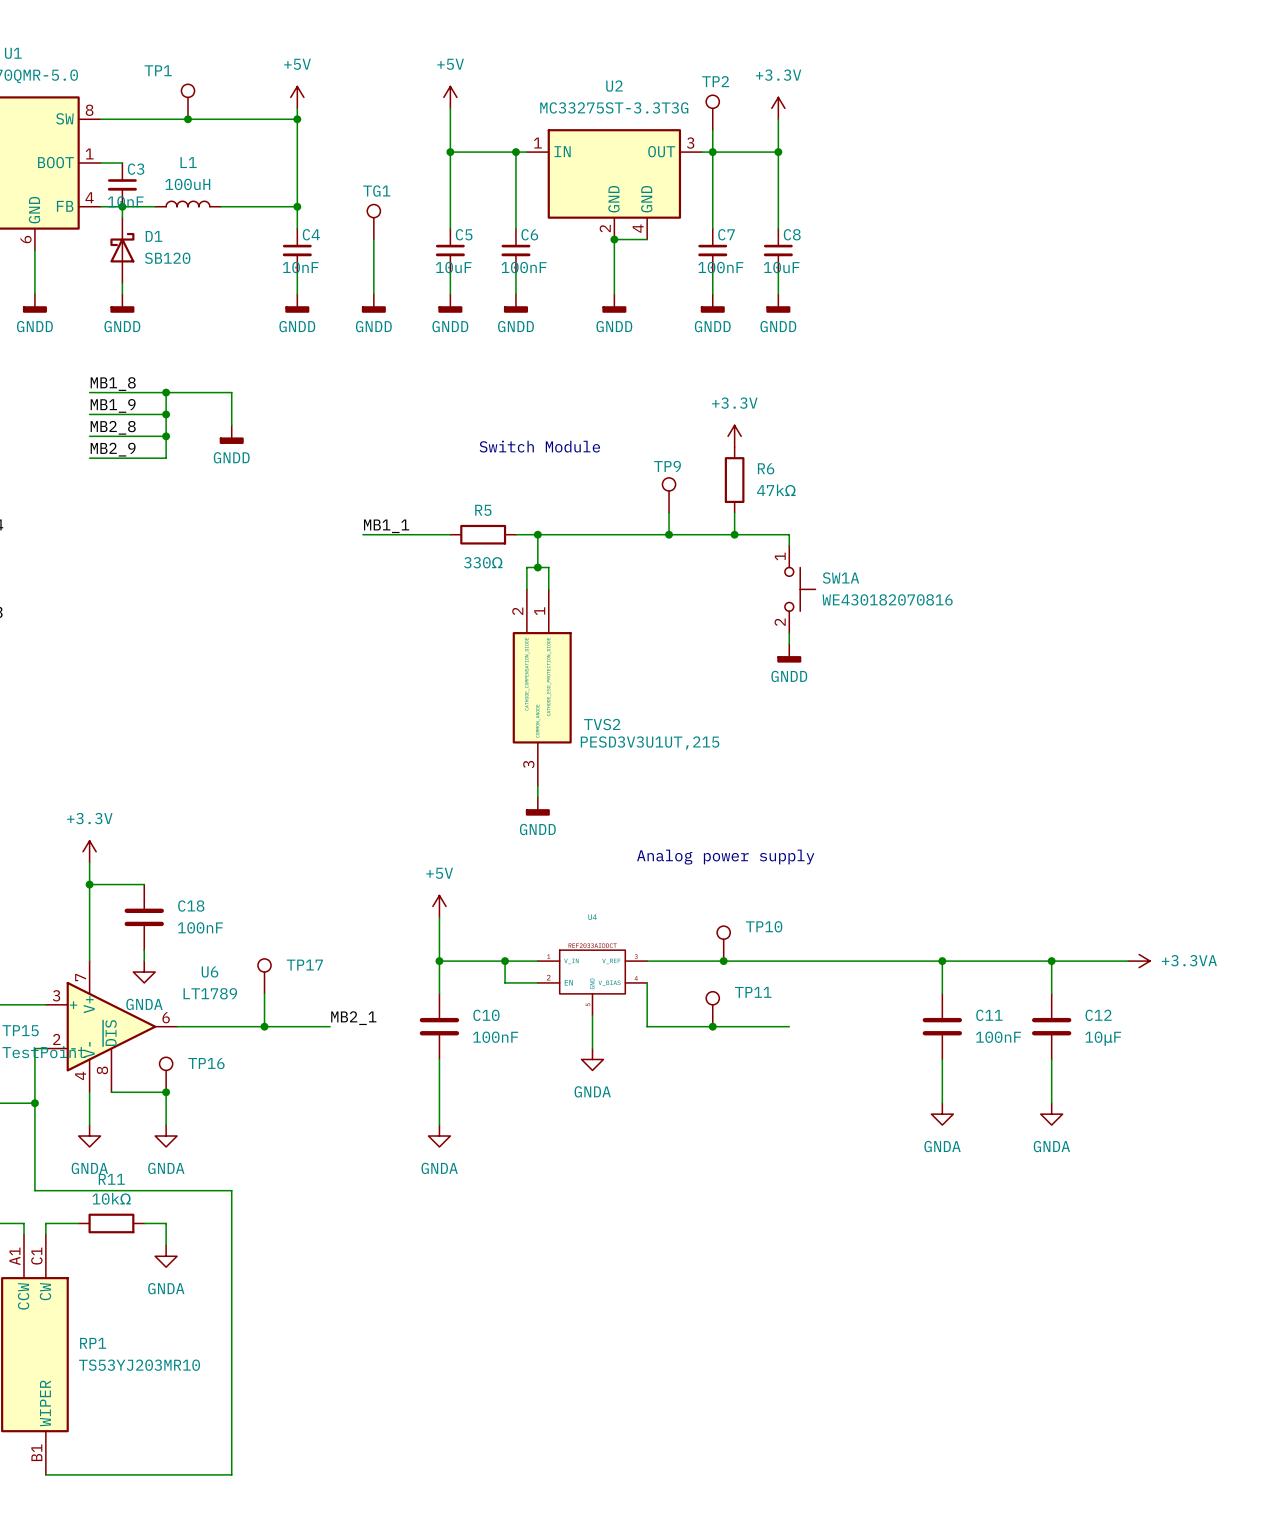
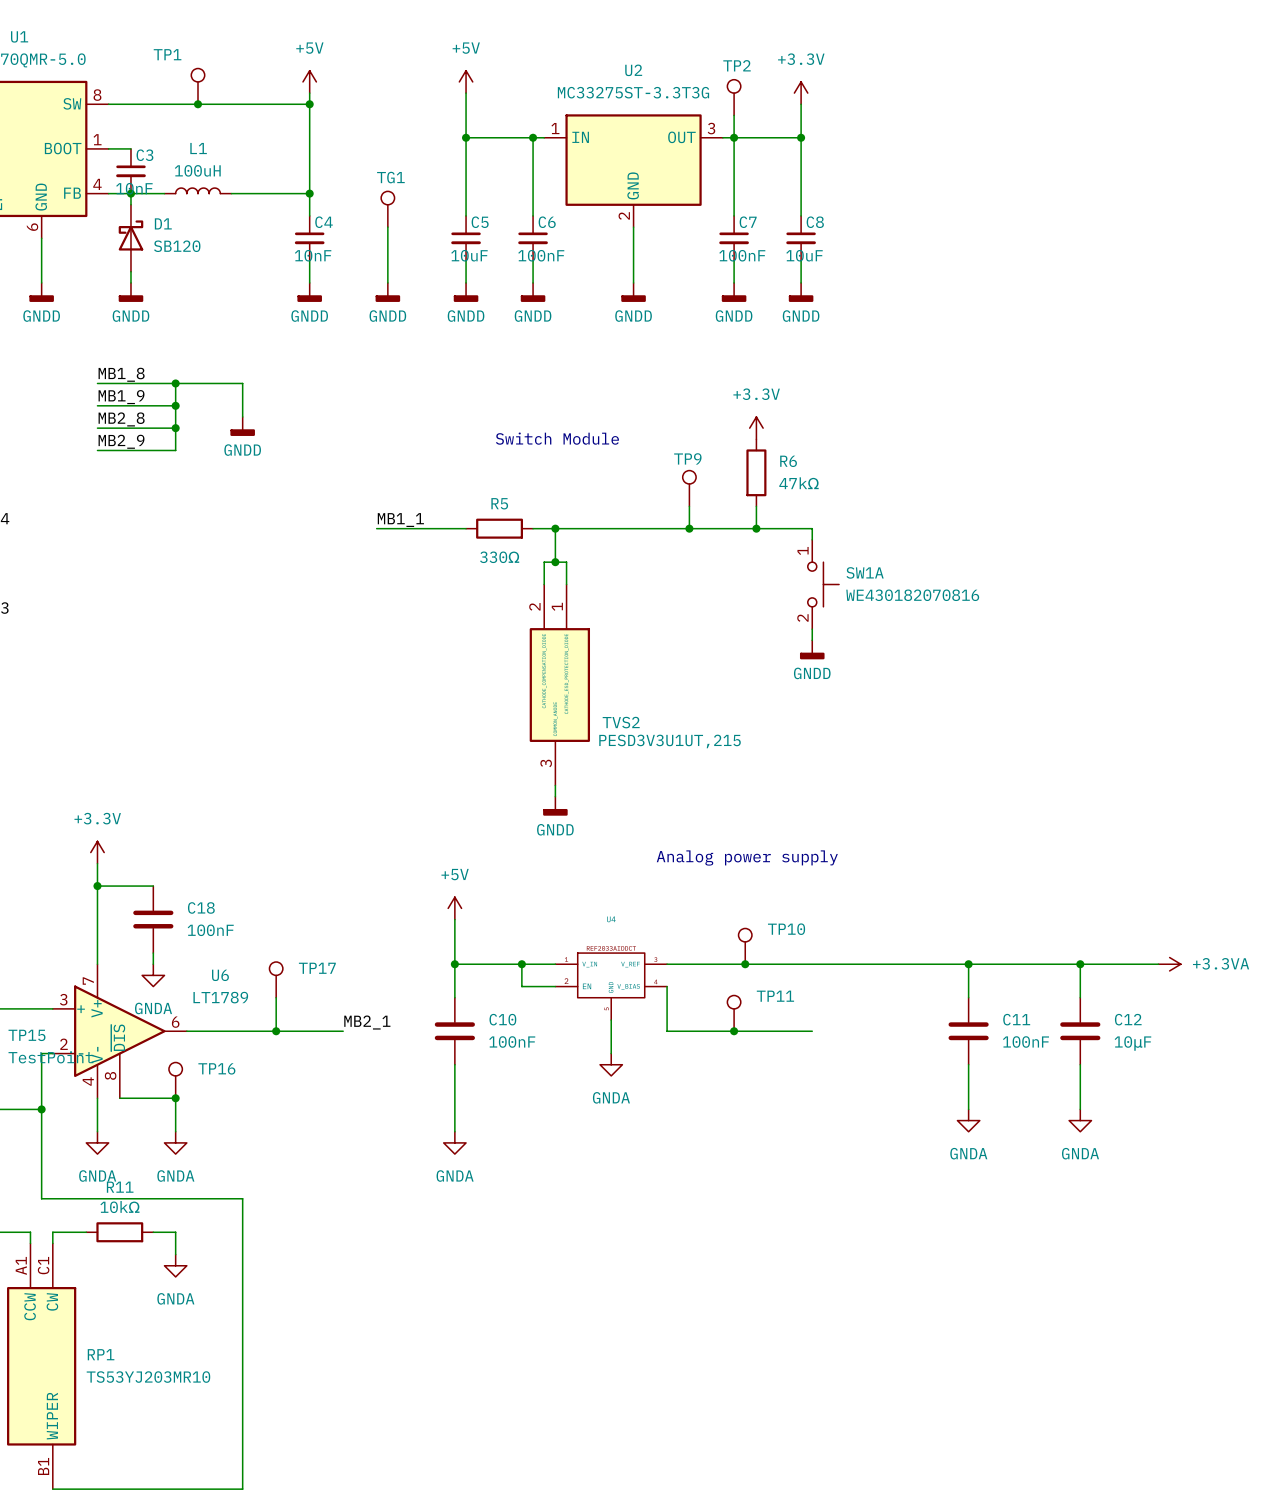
U2 symbol: [526, 129, 702, 240] -> [544, 114, 723, 228]
wire: (614, 239) (647, 239) -> none
junction: (614, 239) -> none

